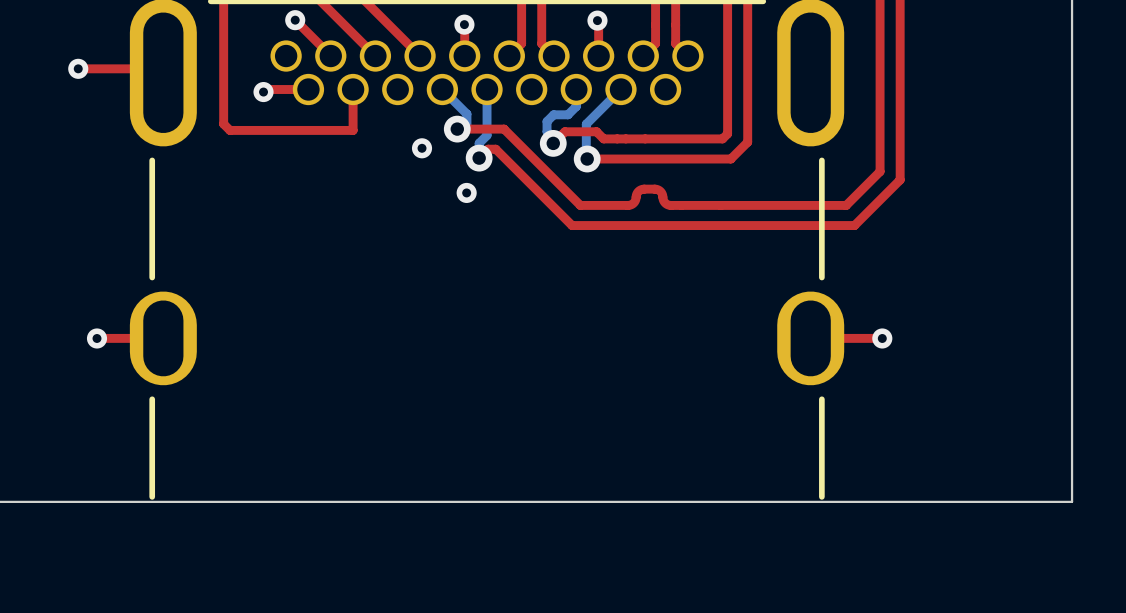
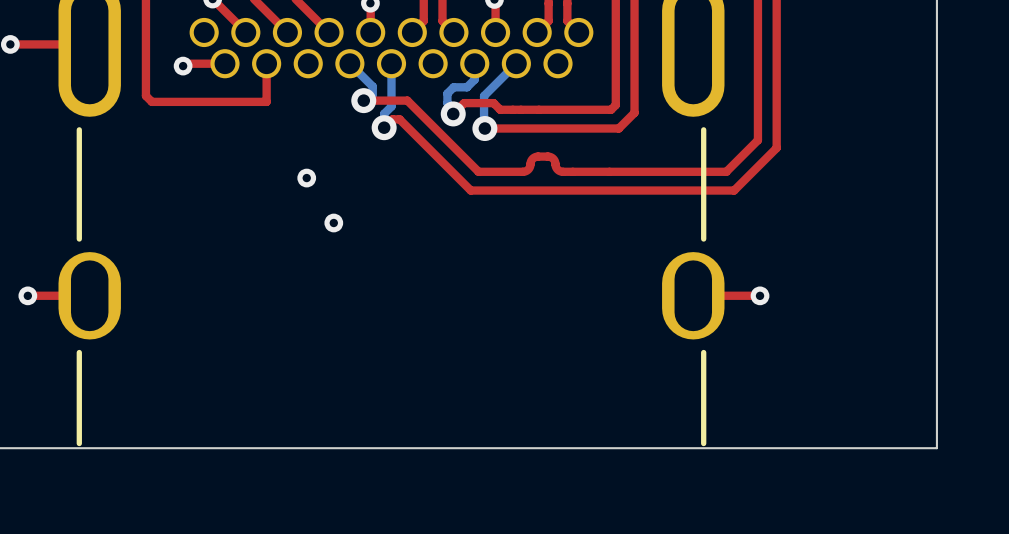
via: (422, 148) -> none
via: (466, 192) -> none
via: none -> (306, 178)
via: none -> (333, 223)

